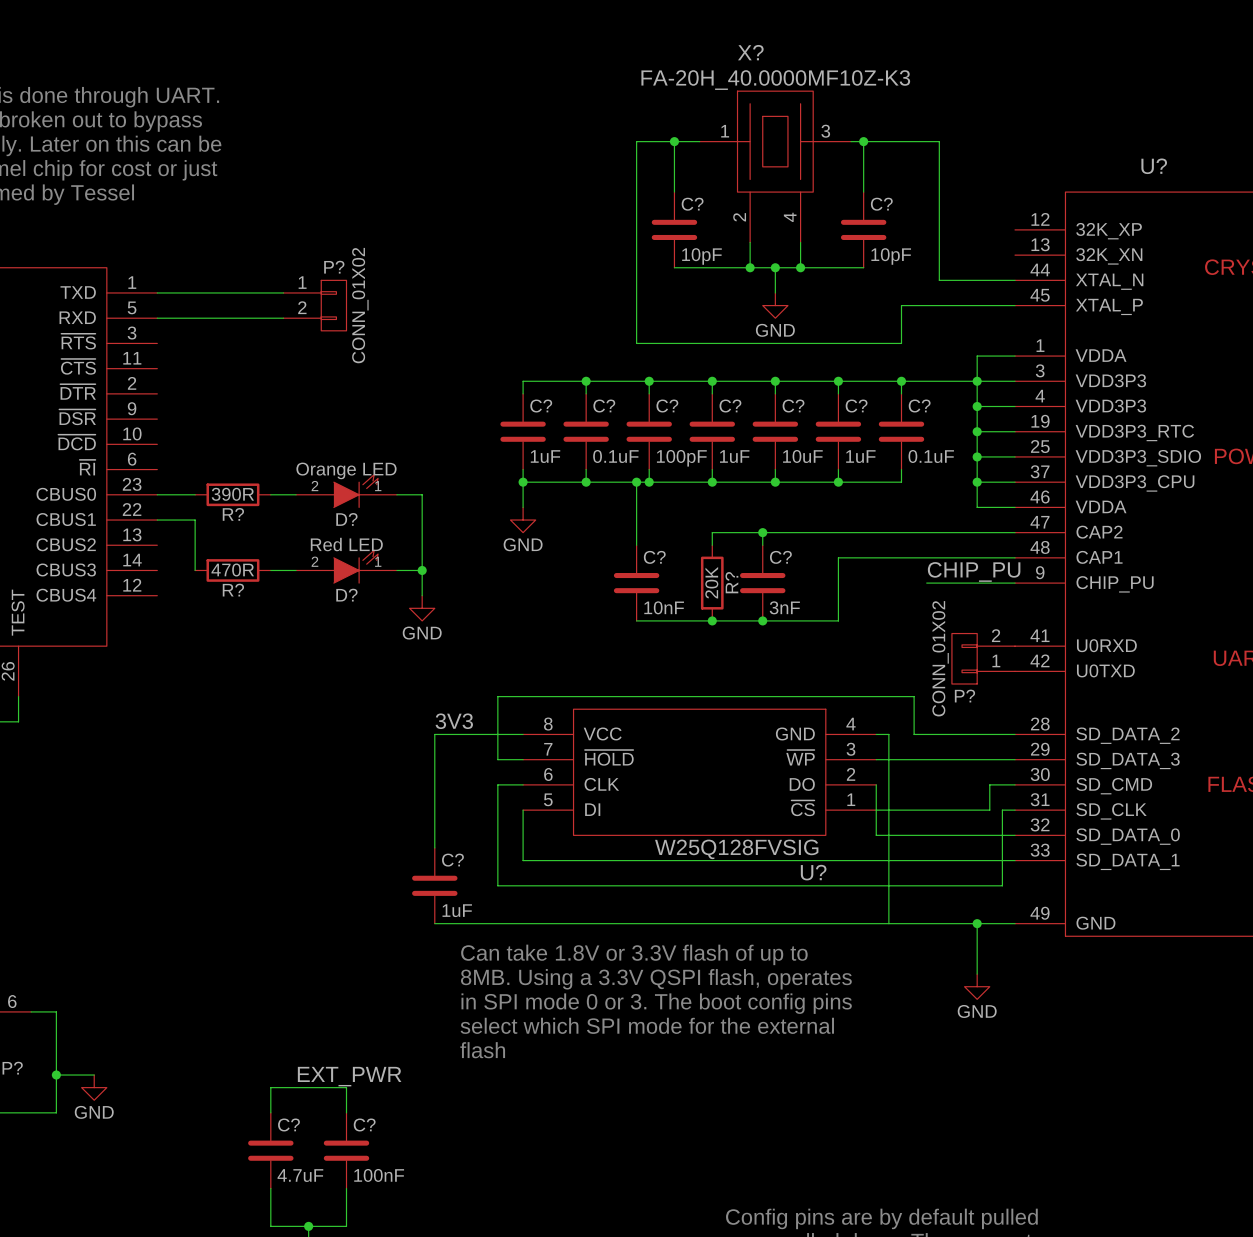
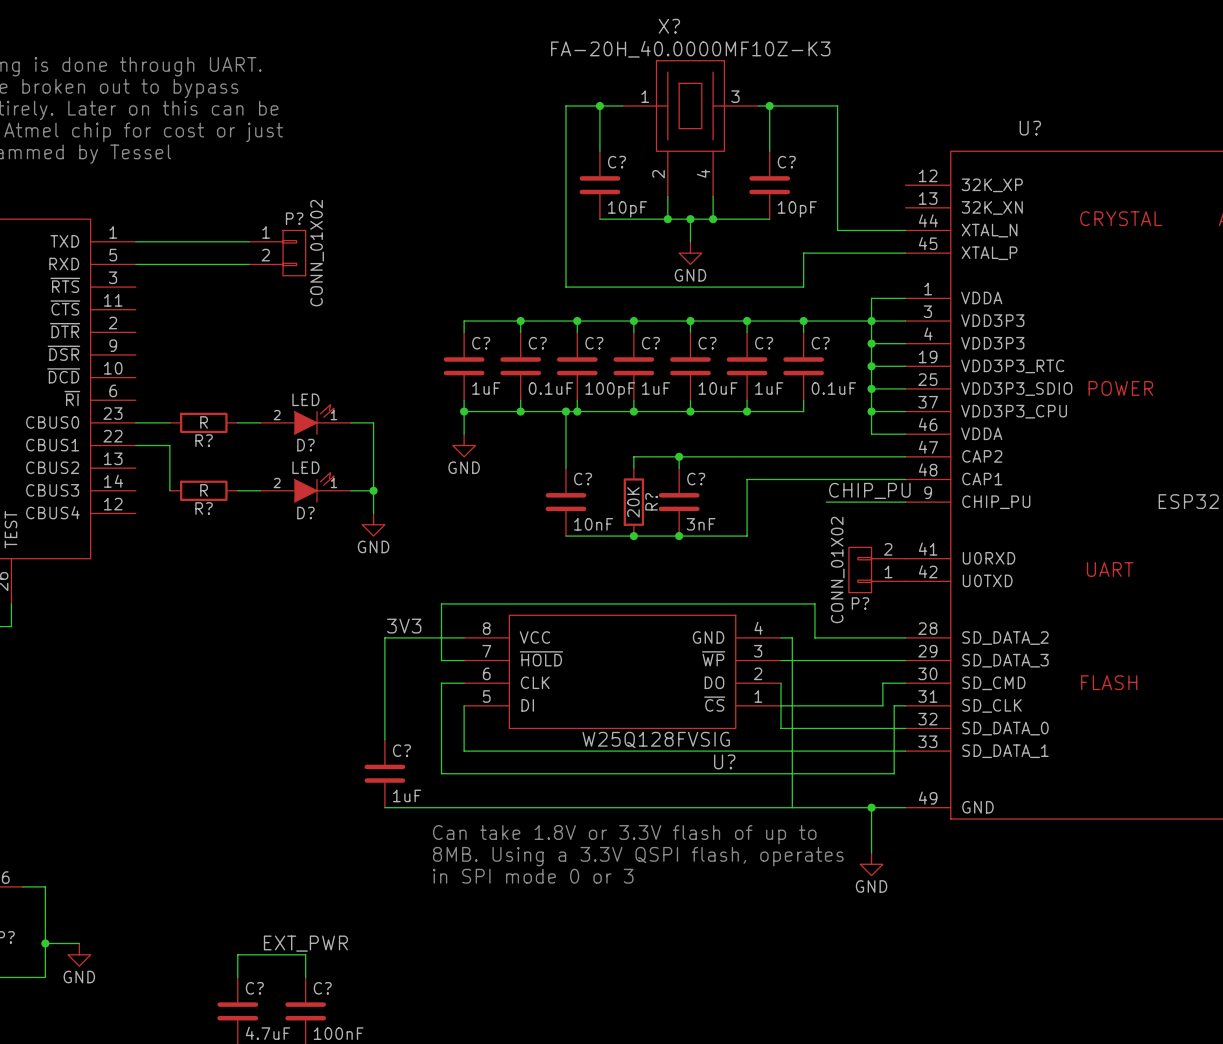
D? value: Orange LED (346, 470) -> LED (305, 399)
R? value: 390R (232, 494) -> R (204, 422)
D? value: Red LED (346, 544) -> LED (305, 467)
R? value: 470R (232, 570) -> R (204, 490)
text position: Can take 1.8V or 3.3V flash of up to (634, 954) -> Can take 1.8V or 3.3V flash of up to (624, 834)
text position: 8MB. Using a 3.3V QSPI flash, operates (656, 979) -> 8MB. Using a 3.3V QSPI flash, operates (638, 856)
text: in SPI mode 0 or 3. The boot config pins (656, 1003) -> in SPI mode 0 or 3 (533, 876)
text: select which SPI mode for the external (647, 1025) -> none
text: flash (482, 1050) -> none

